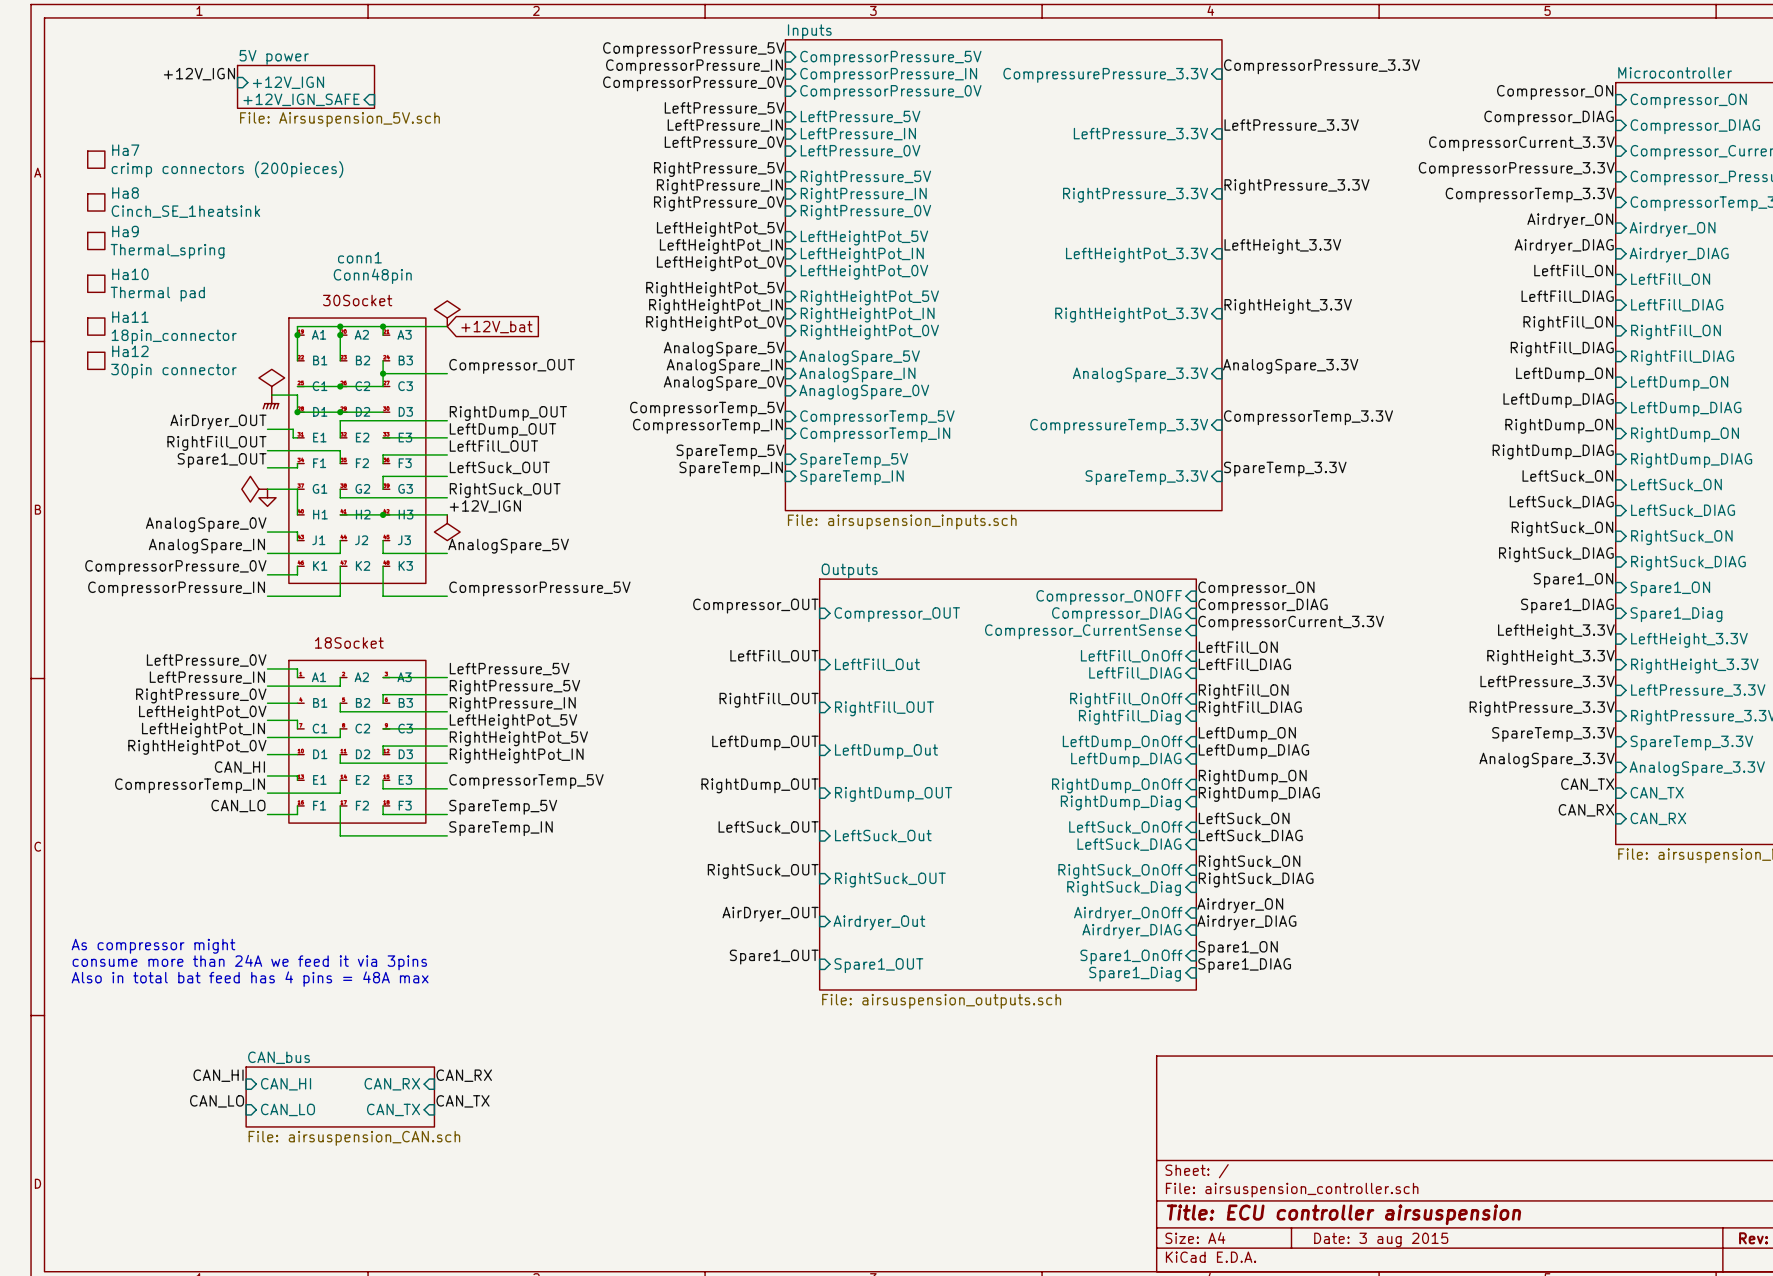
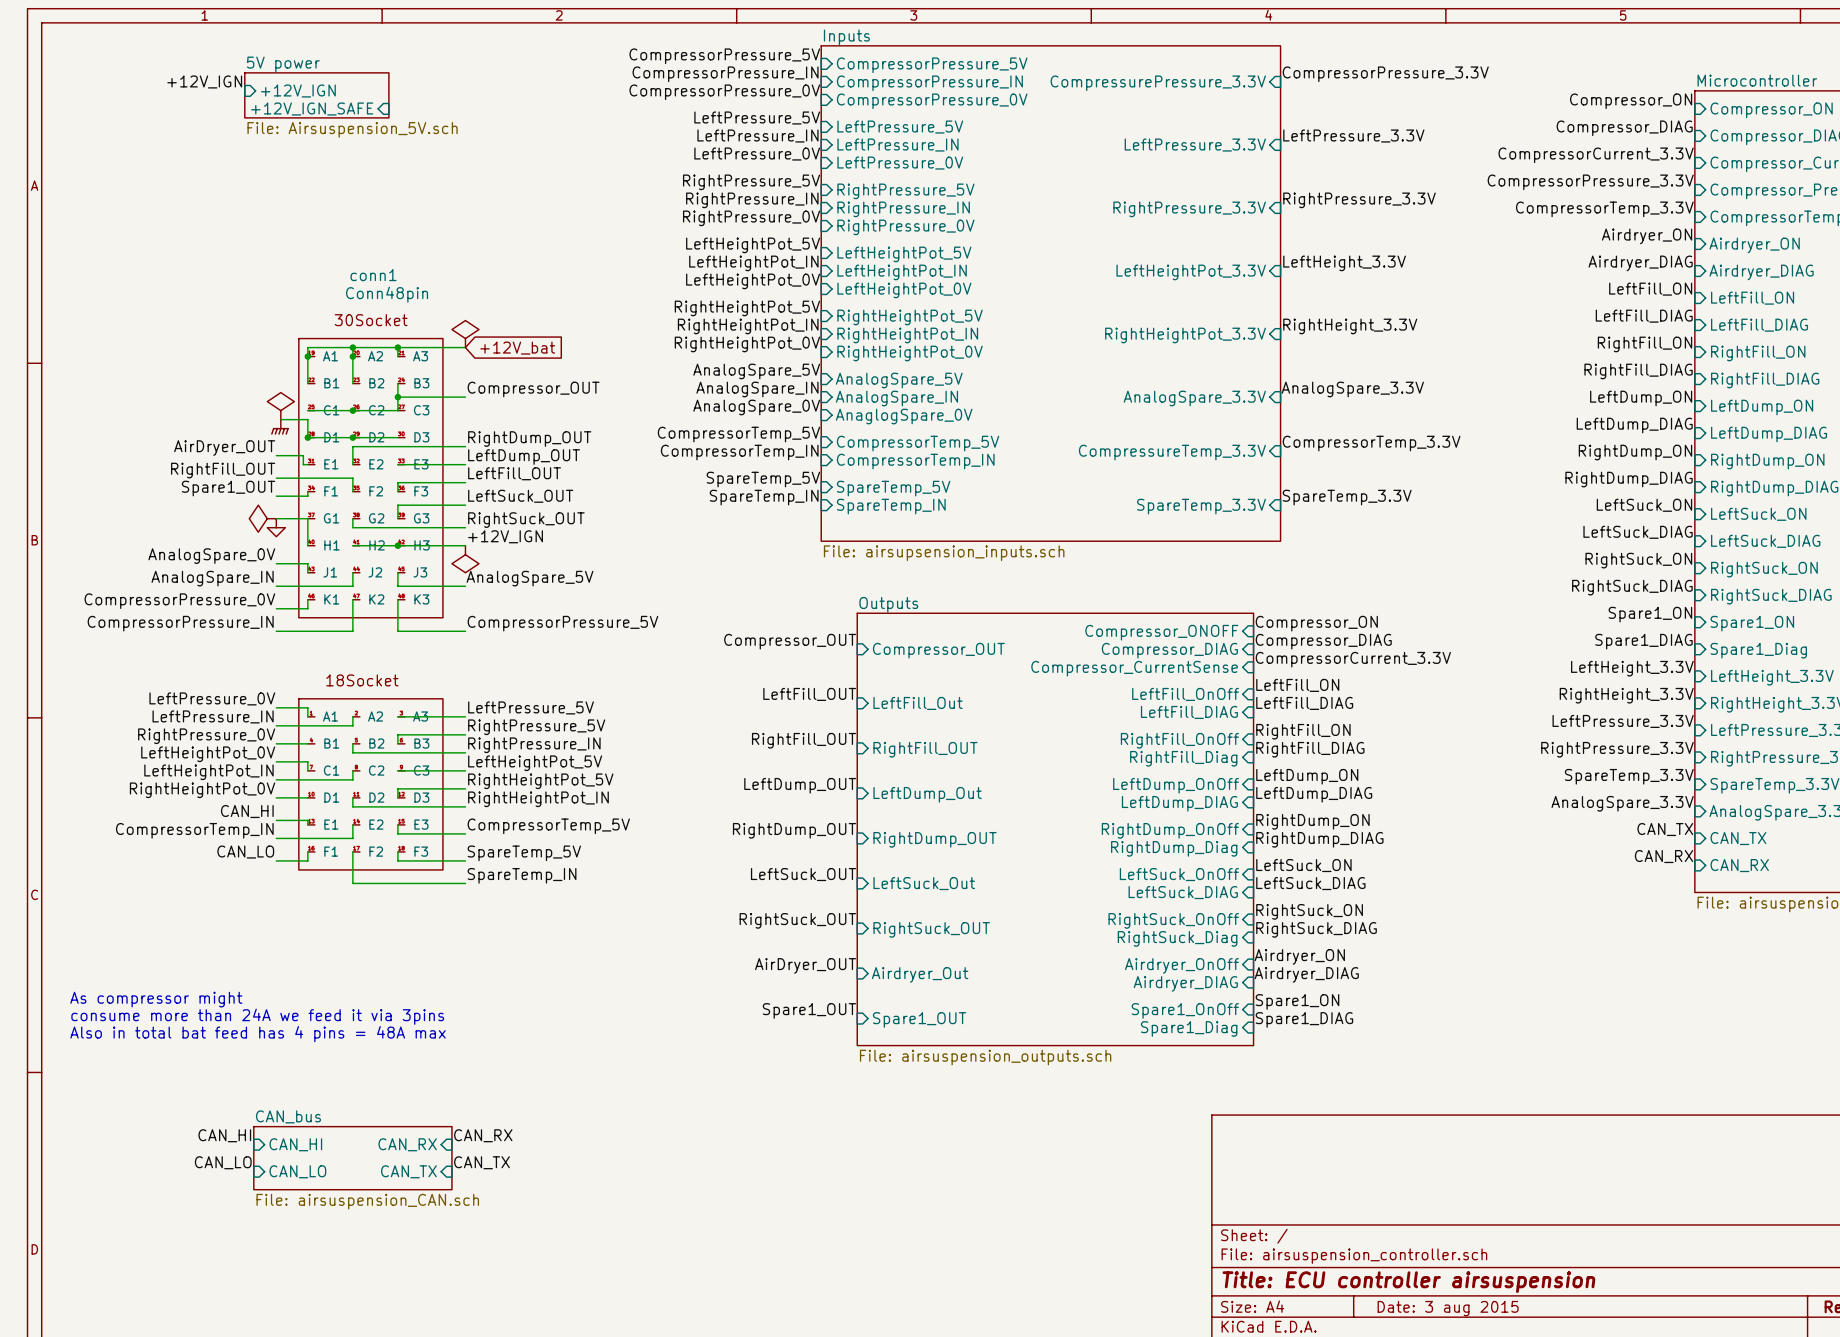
Ha7: crimp connectors (200pieces) (96, 159) -> none
Ha8: Cinch_SE_1heatsink (96, 202) -> none
Ha9: Thermal_spring (96, 240) -> none
Ha10: Thermal pad (96, 283) -> none
Ha11: 18pin_connector (96, 326) -> none
Ha12: 30pin connector (96, 360) -> none

